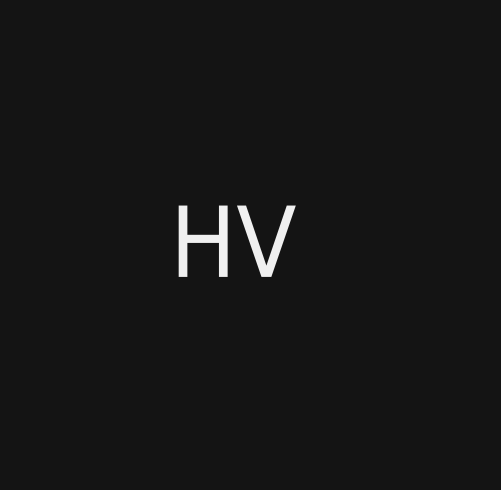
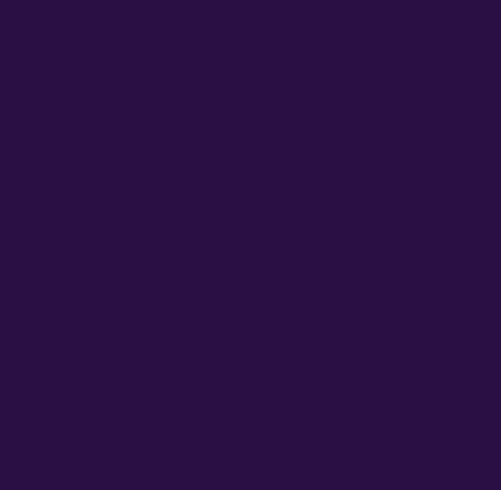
text: HV (237, 241) -> none

